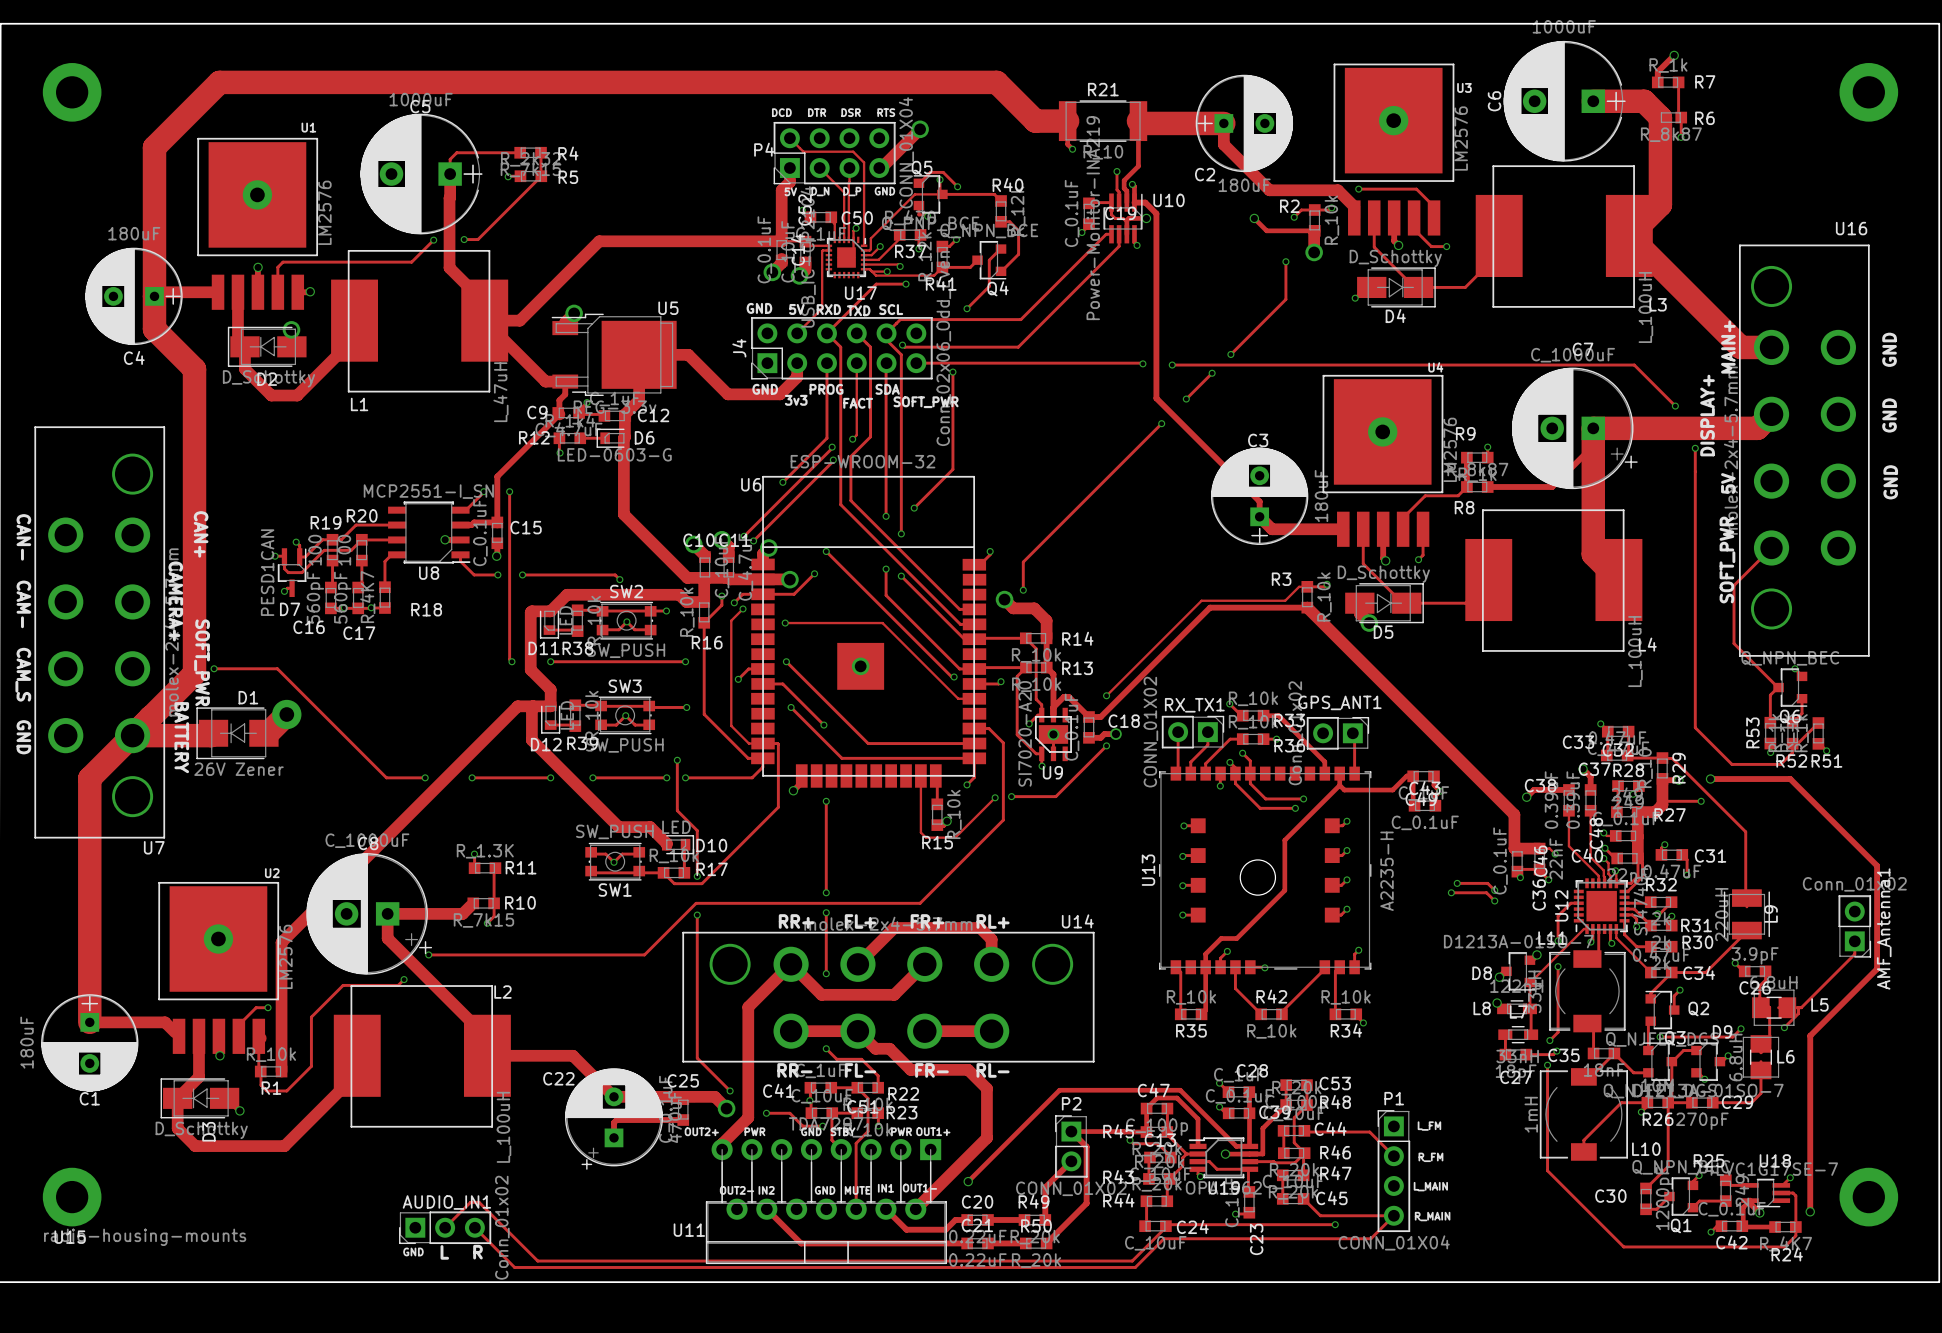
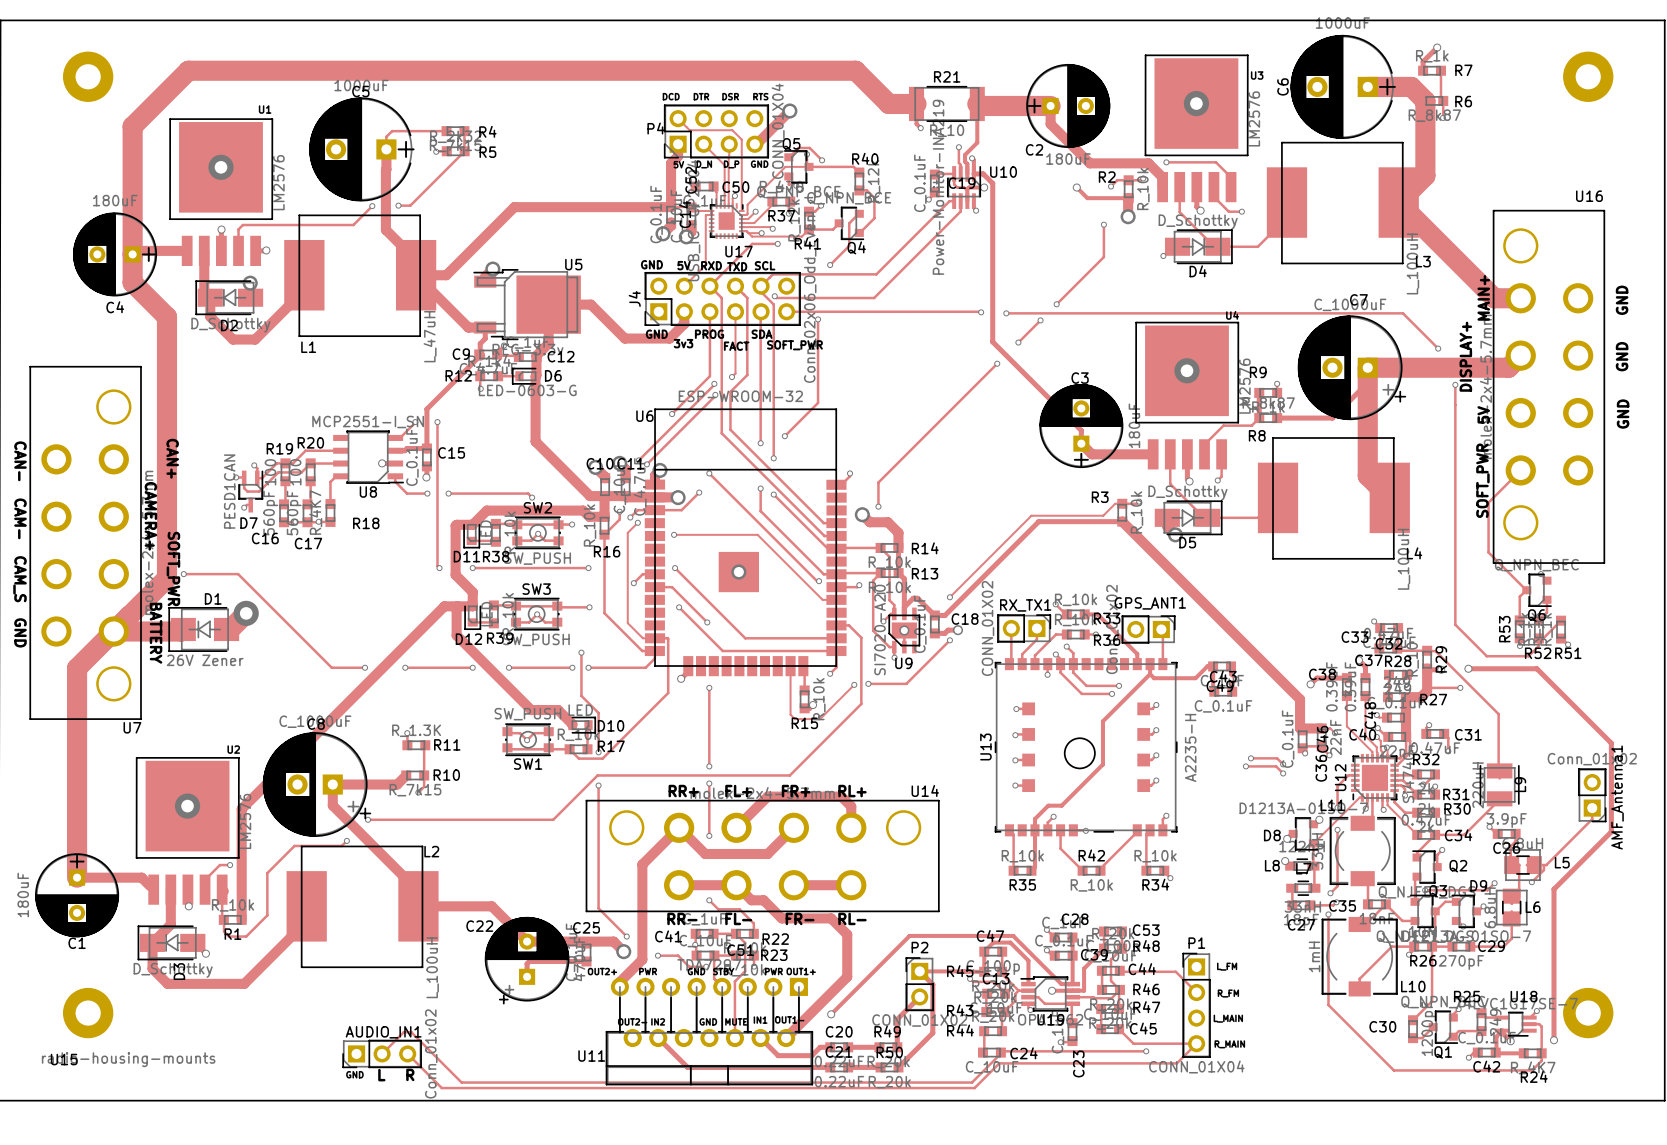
U15 footprint: [42, 63, 1899, 1227] -> [62, 51, 1614, 1039]

